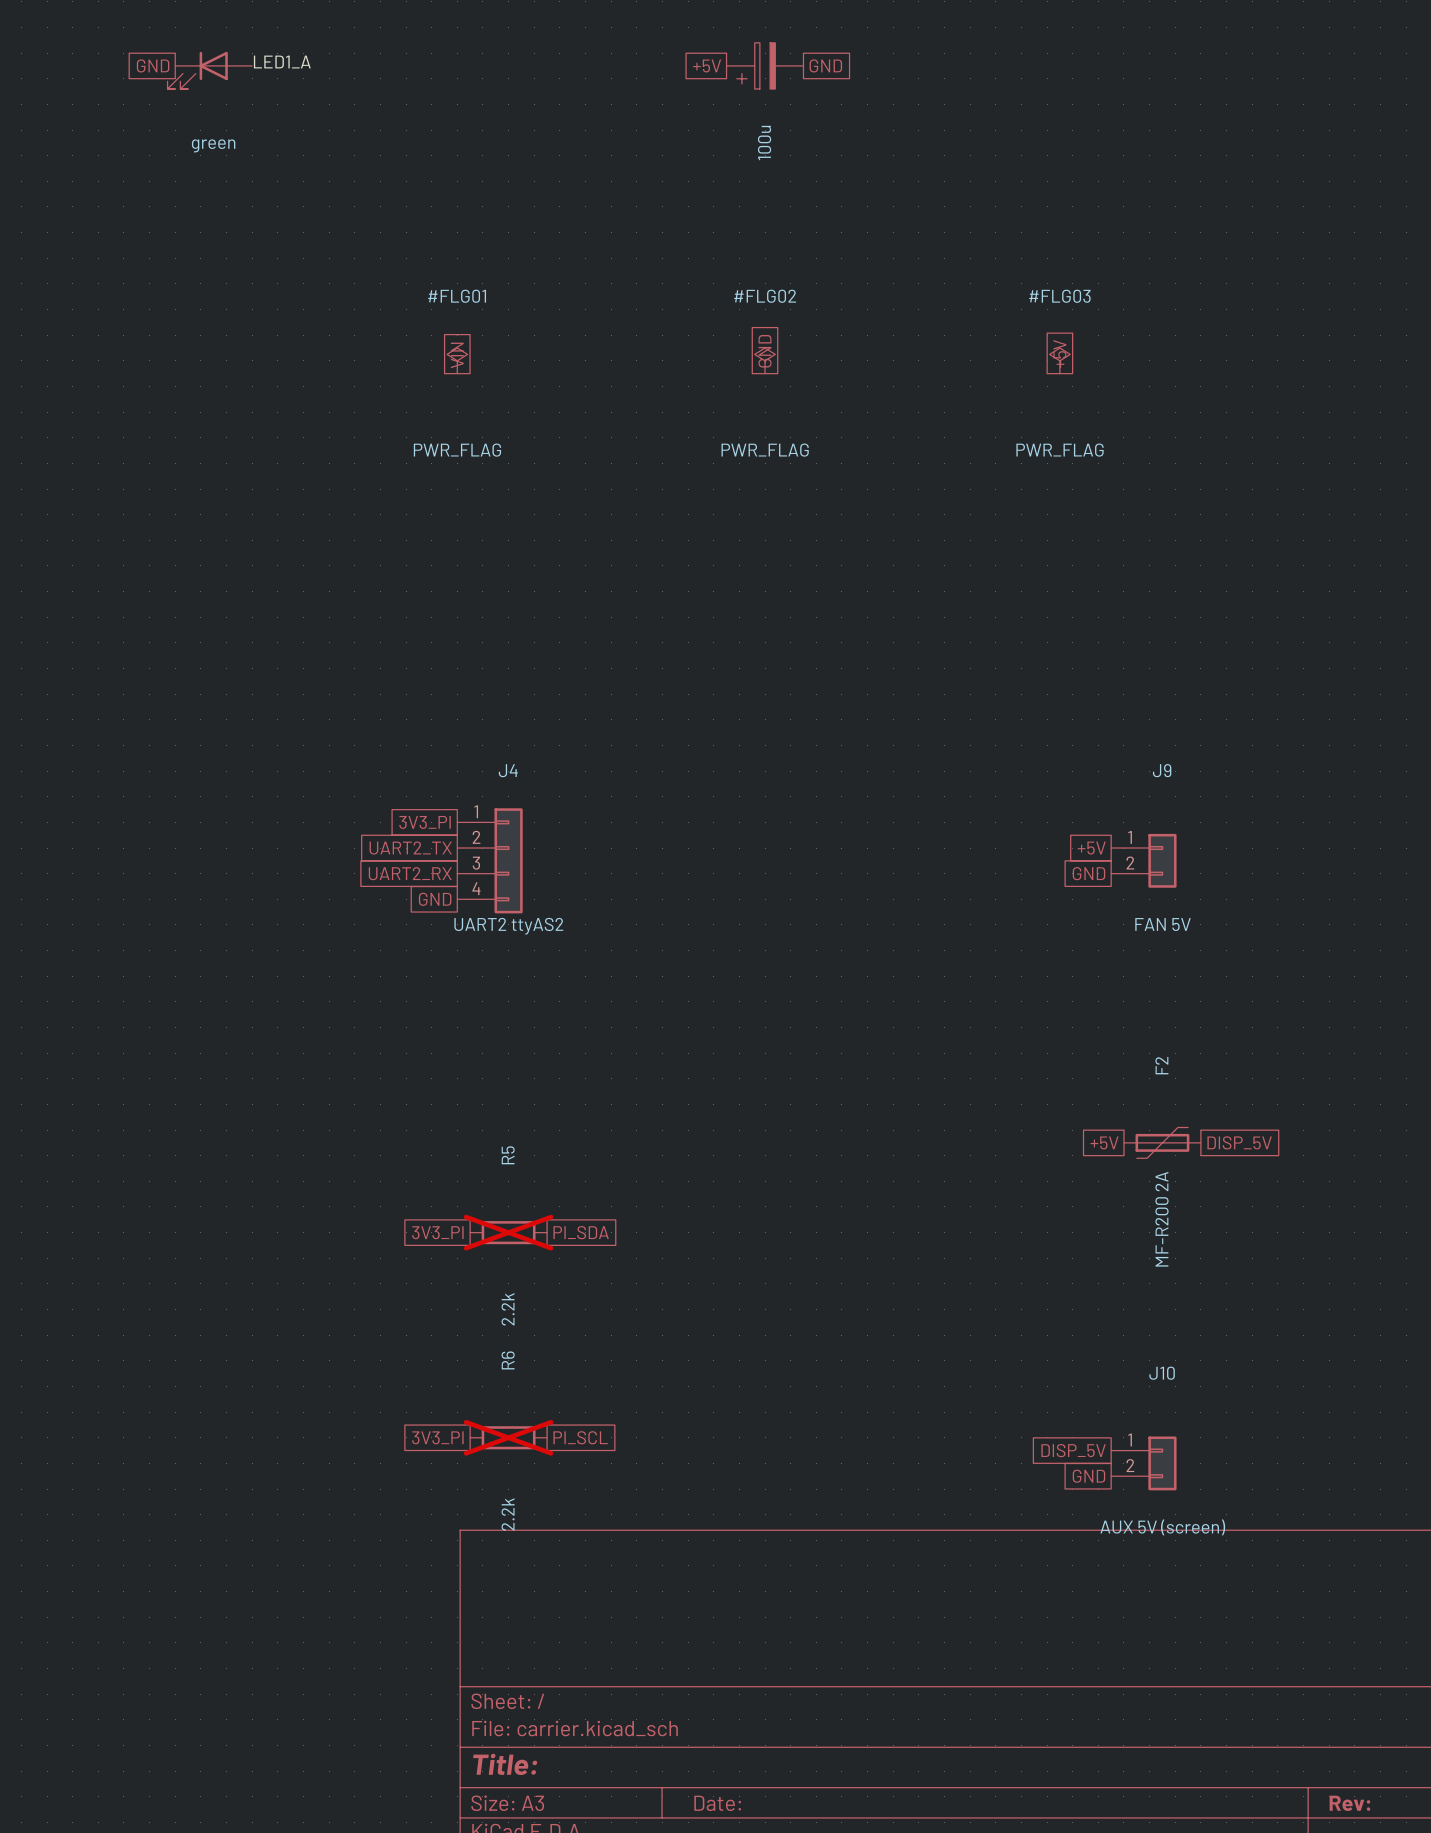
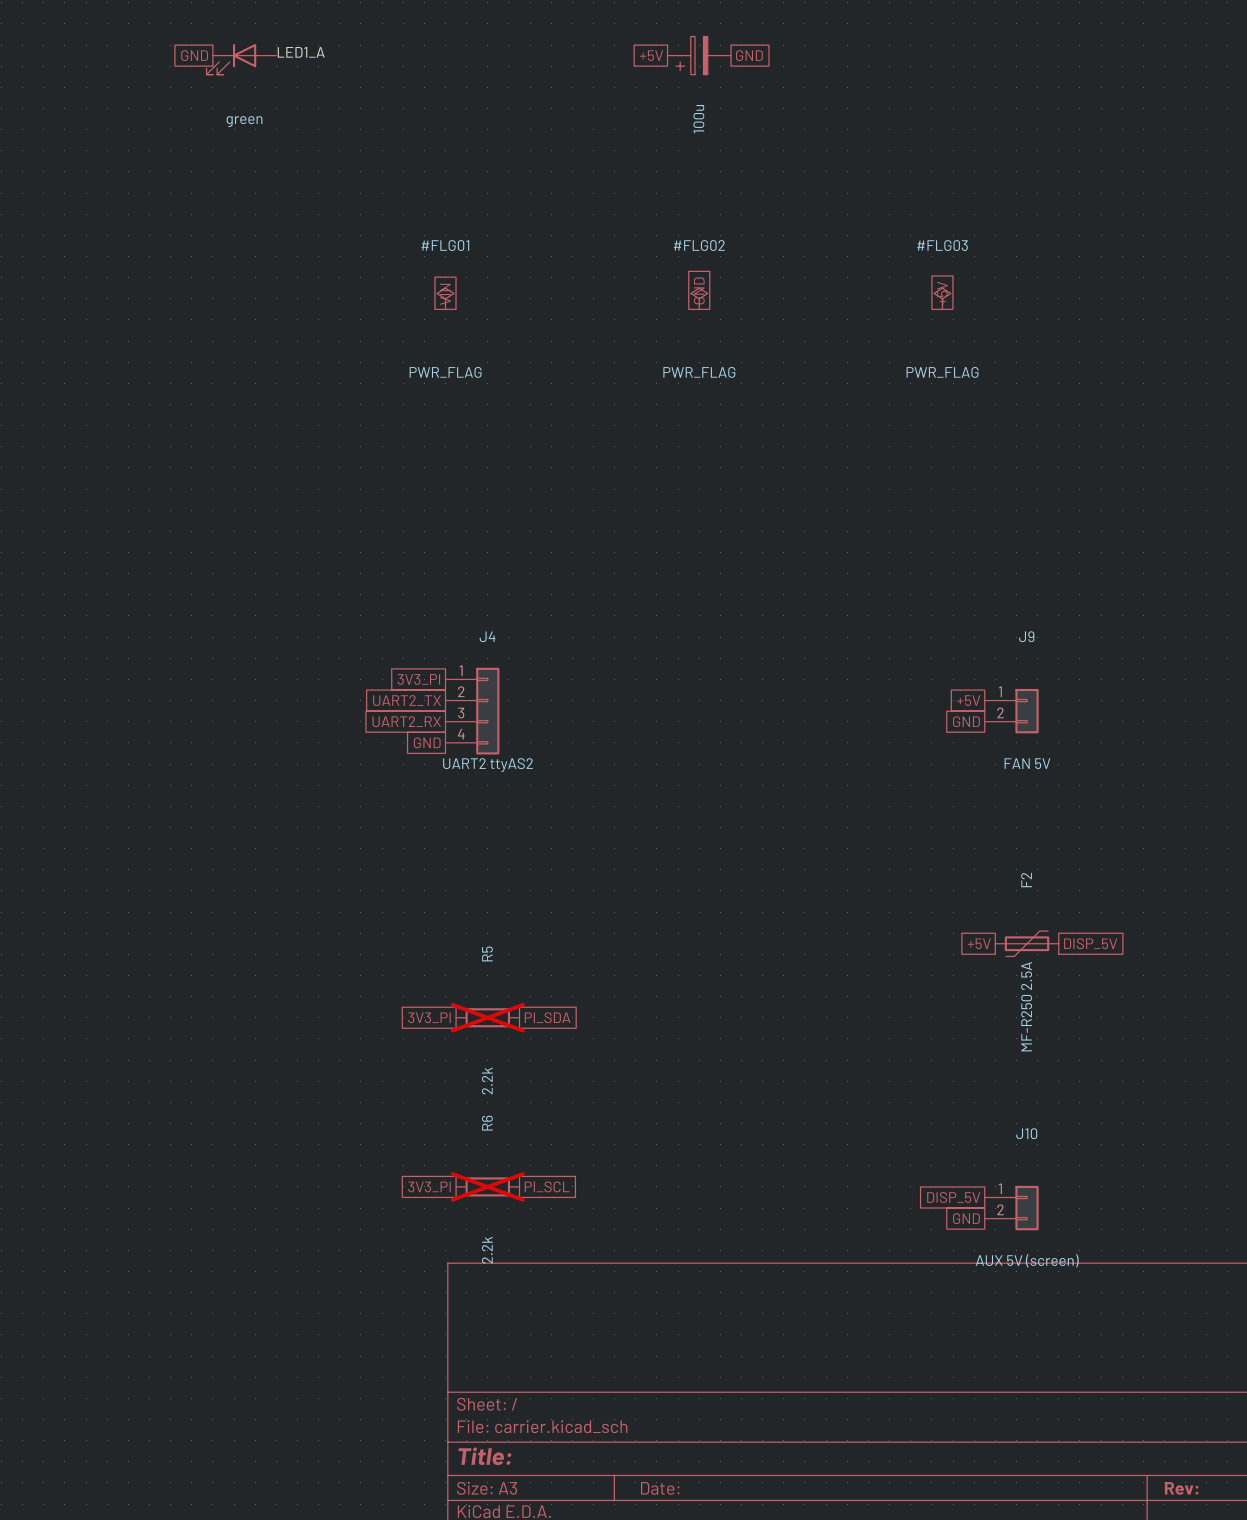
F2 value: MF-R200 2A (1161, 1219) -> MF-R250 2.5A (1026, 1006)

